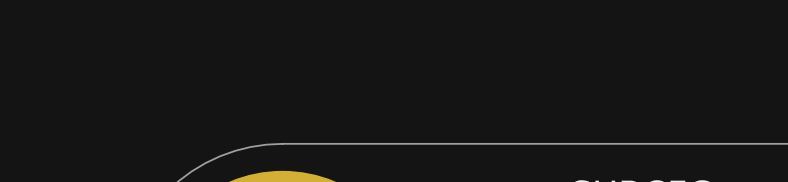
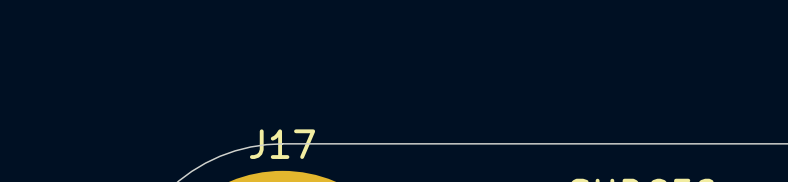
J17 name: none -> J17 (282, 144)

